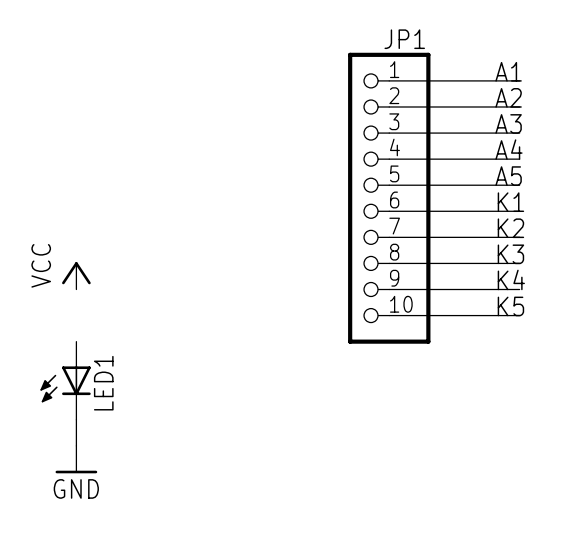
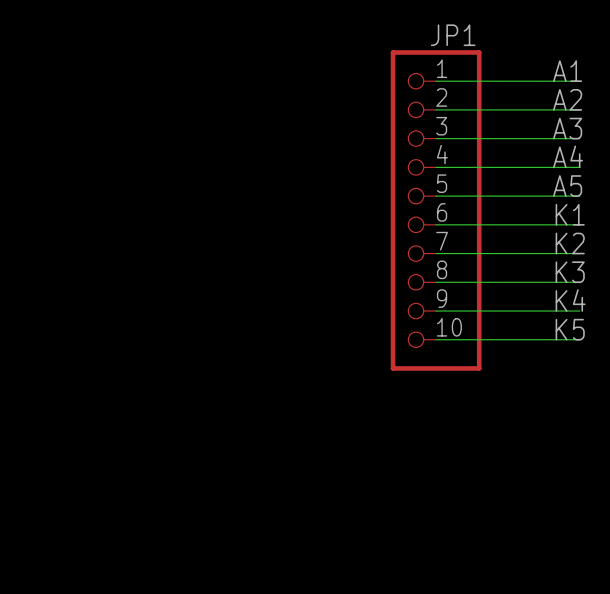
power symbol: VCC (76, 275) -> none
LED1: (65, 380) -> none
wire: (76, 419) (76, 445) -> none
power symbol: GND (76, 459) -> none

